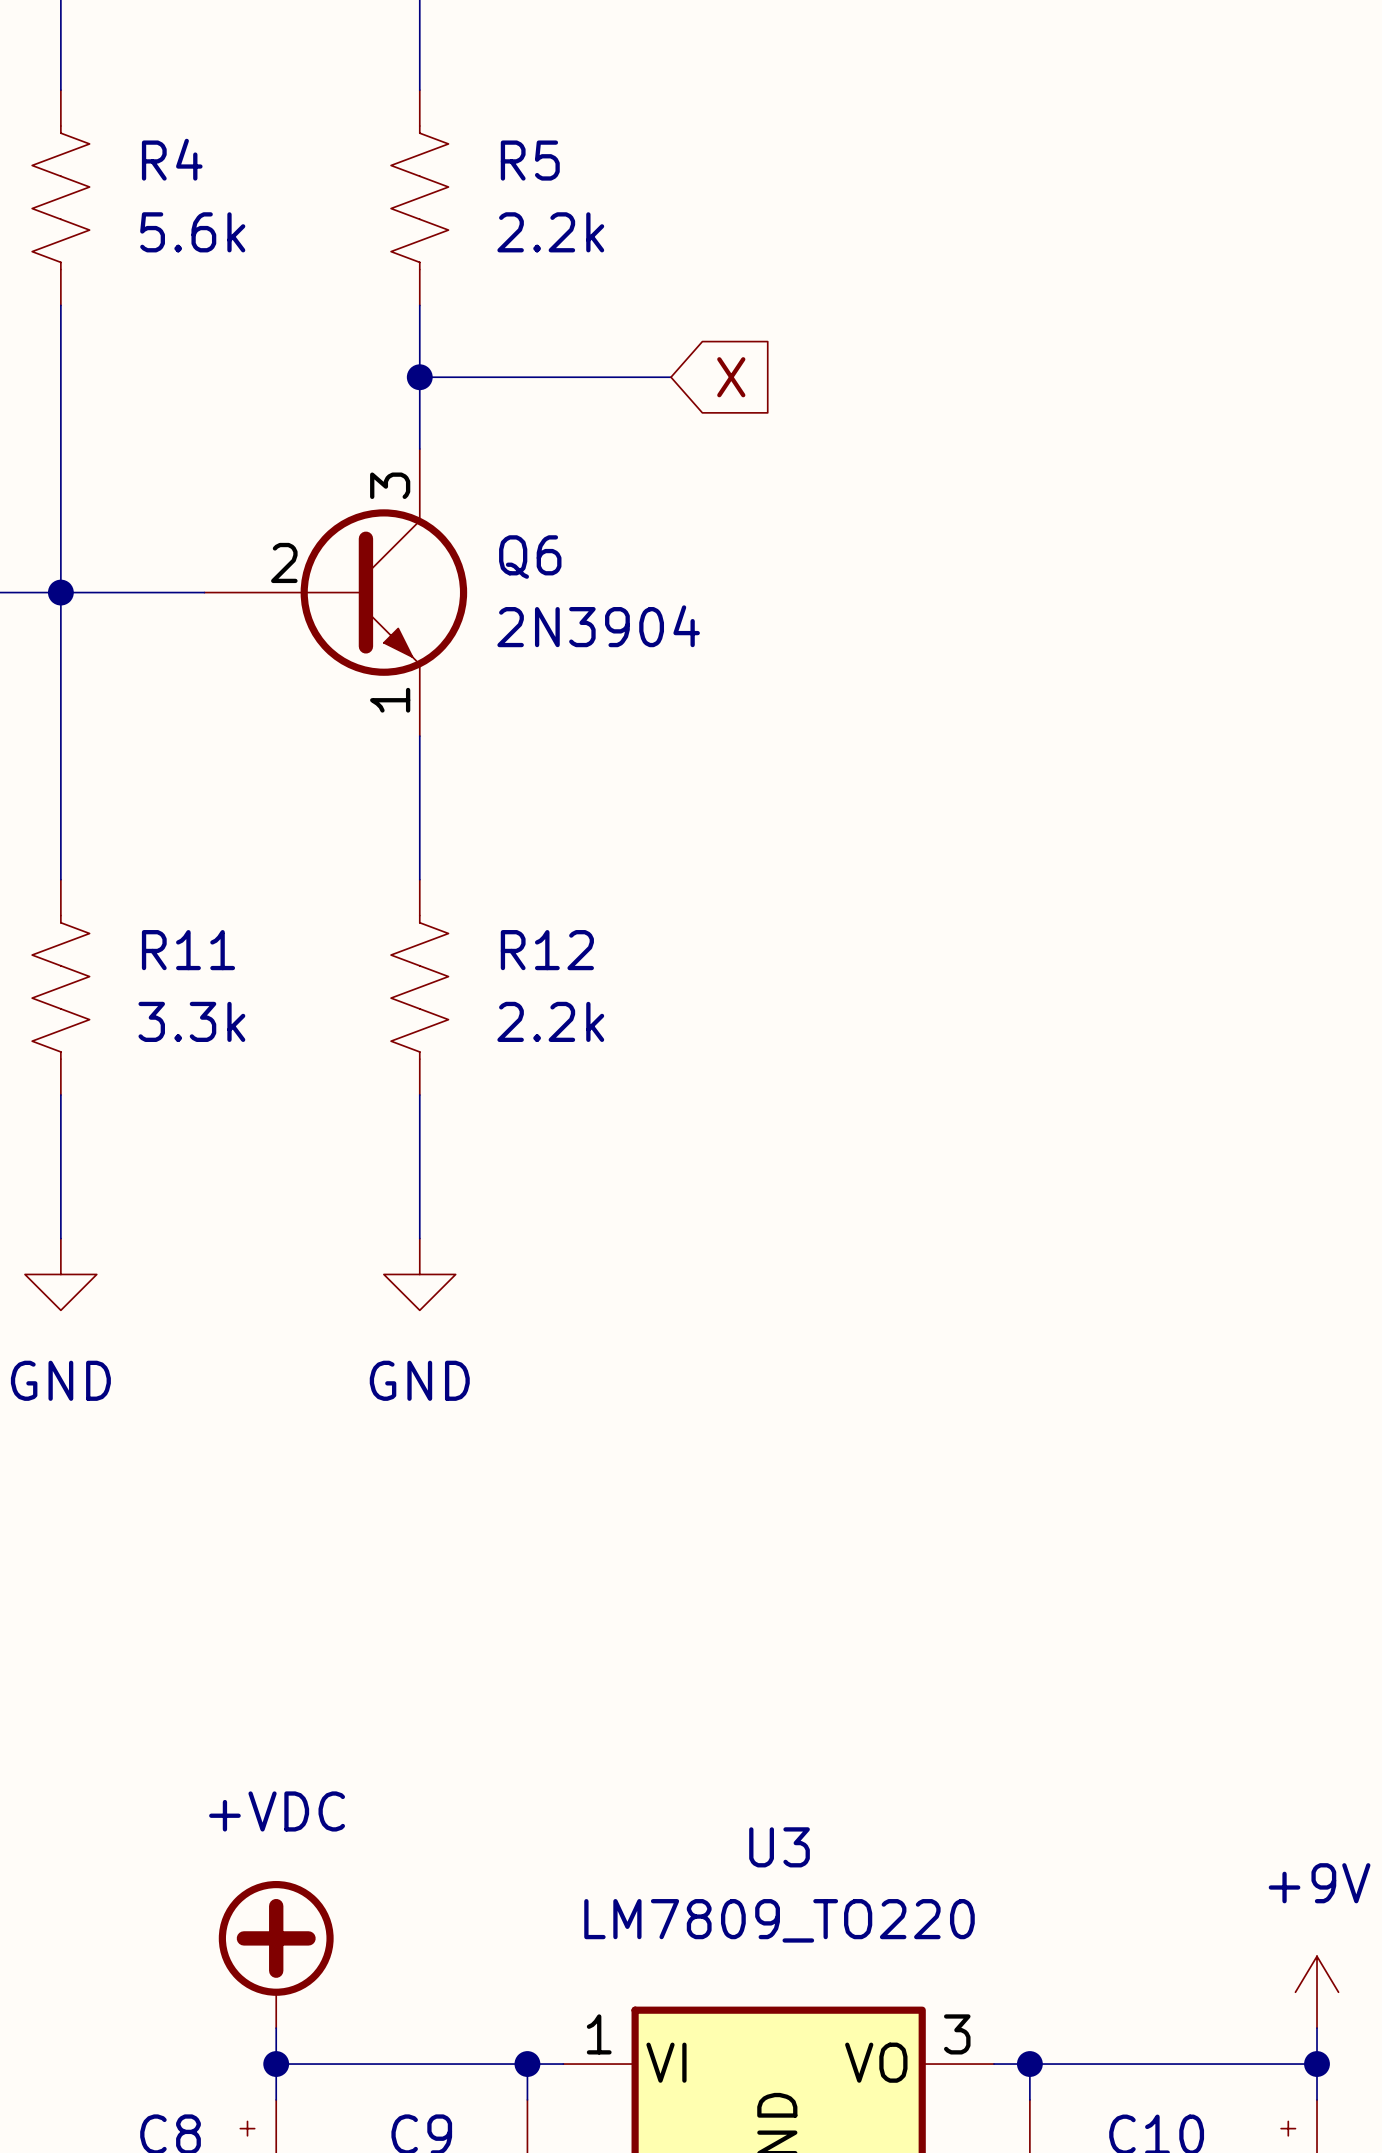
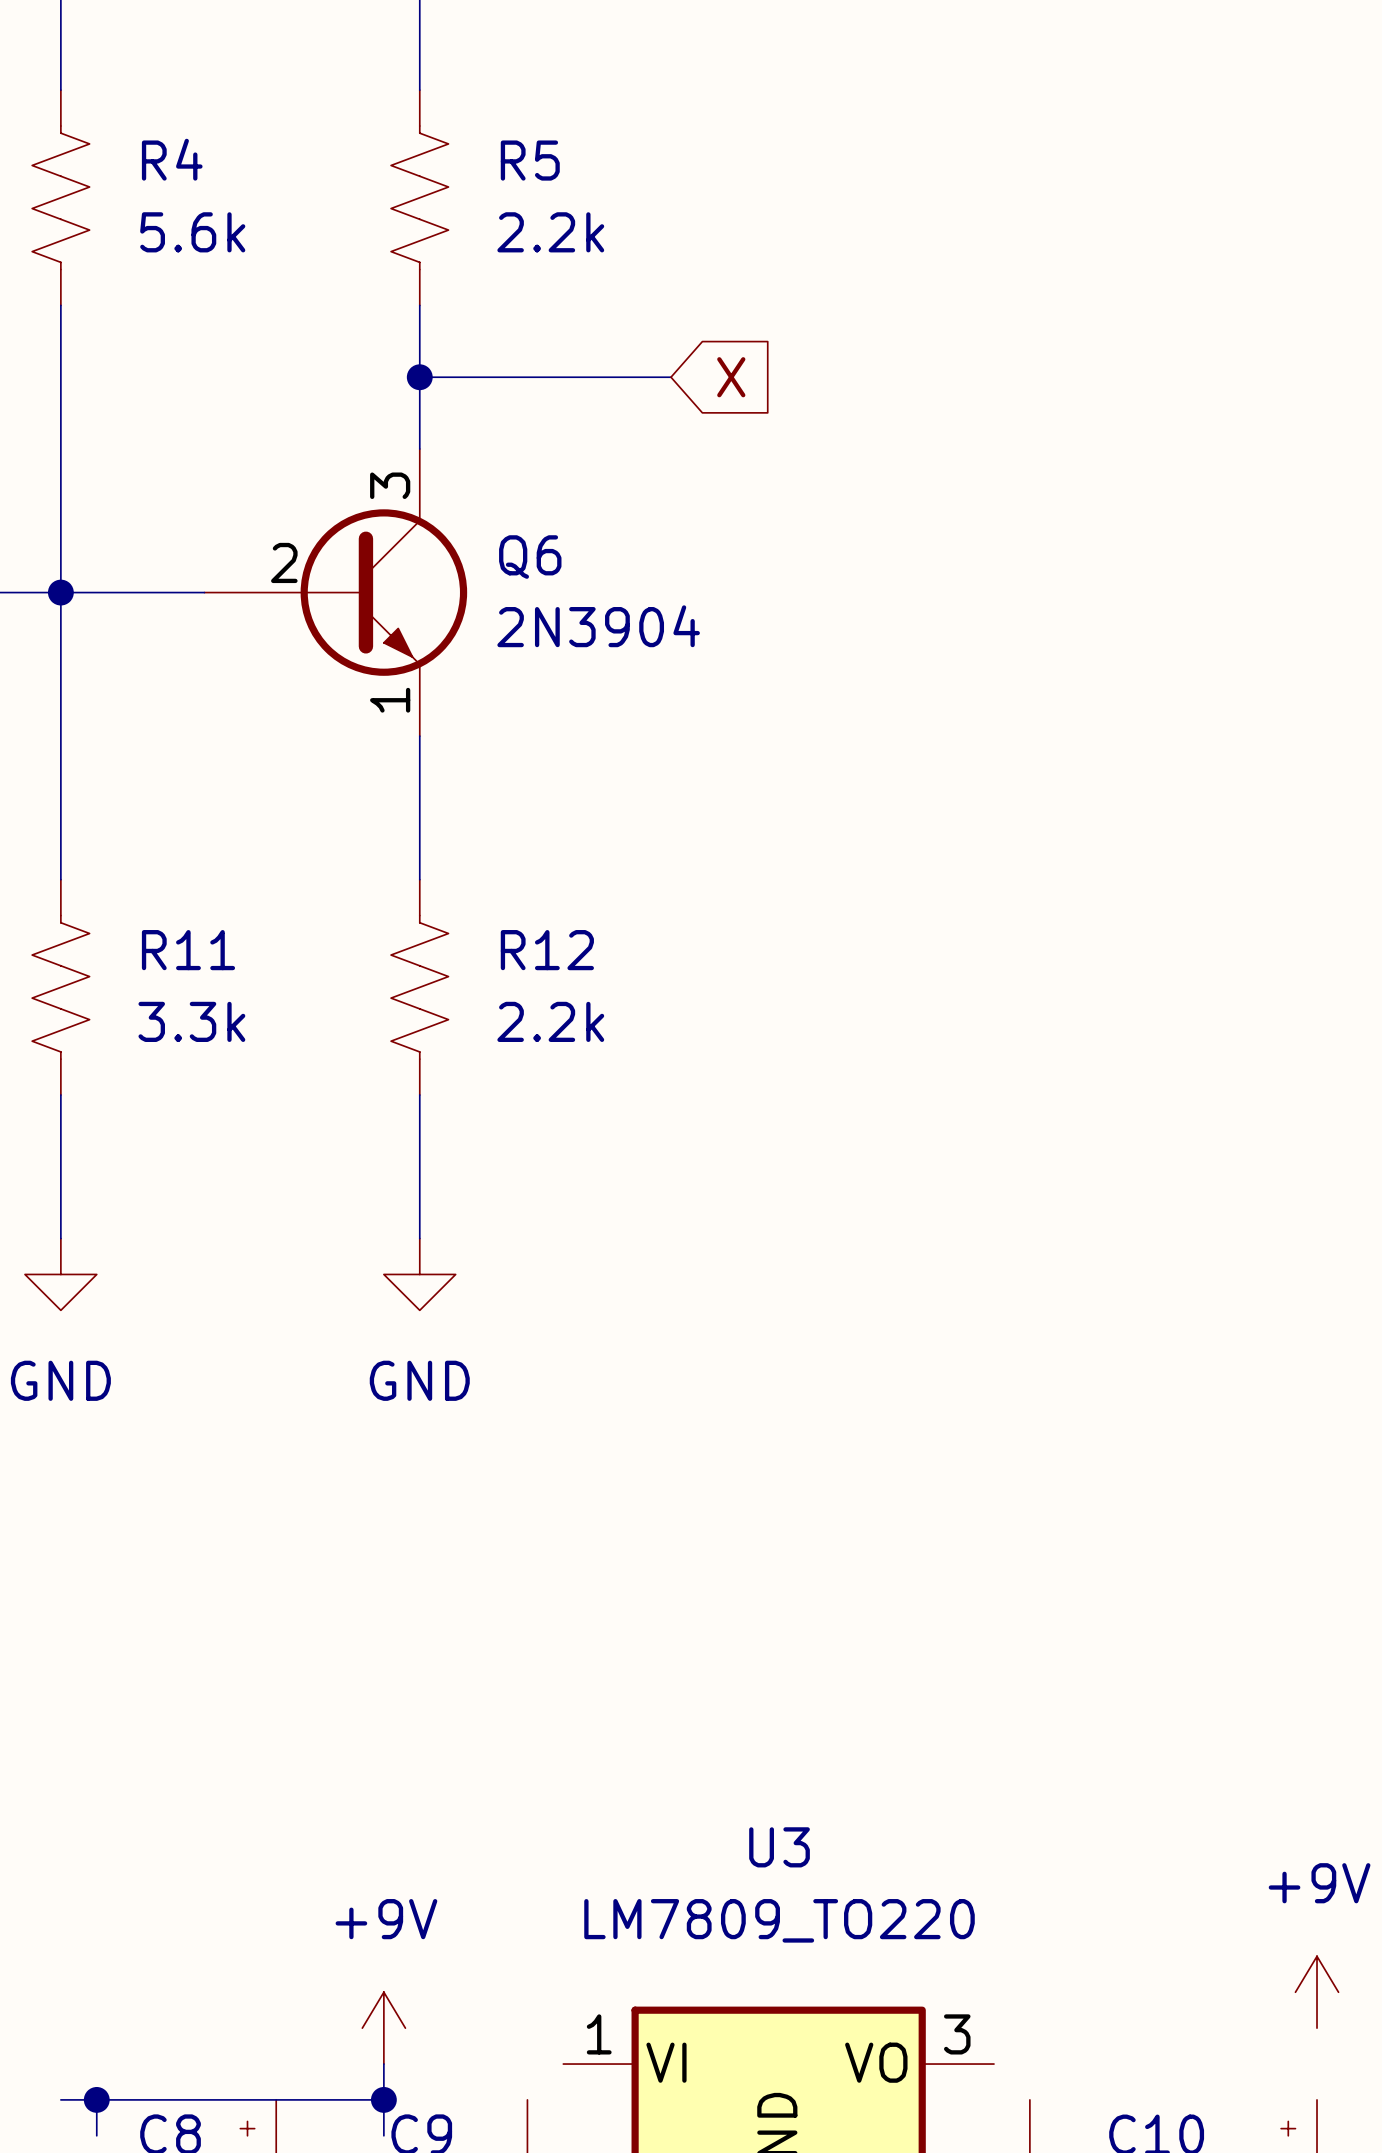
power symbol: +VDC (276, 1954) -> none
wire: (276, 2028) (276, 2099) -> (383, 2064) (383, 2135)
power symbol: none -> +9V (383, 2028)
wire: (1317, 2028) (1317, 2099) -> none
wire: (276, 2064) (563, 2064) -> none
junction: (276, 2064) -> none
wire: (527, 2064) (527, 2099) -> (96, 2099) (96, 2135)
junction: (527, 2064) -> none
wire: (994, 2064) (1317, 2064) -> none
wire: (1029, 2064) (1029, 2099) -> none
junction: (1029, 2064) -> none
junction: (1317, 2064) -> none
wire: none -> (60, 2099) (383, 2099)
junction: none -> (96, 2099)
junction: none -> (383, 2099)

